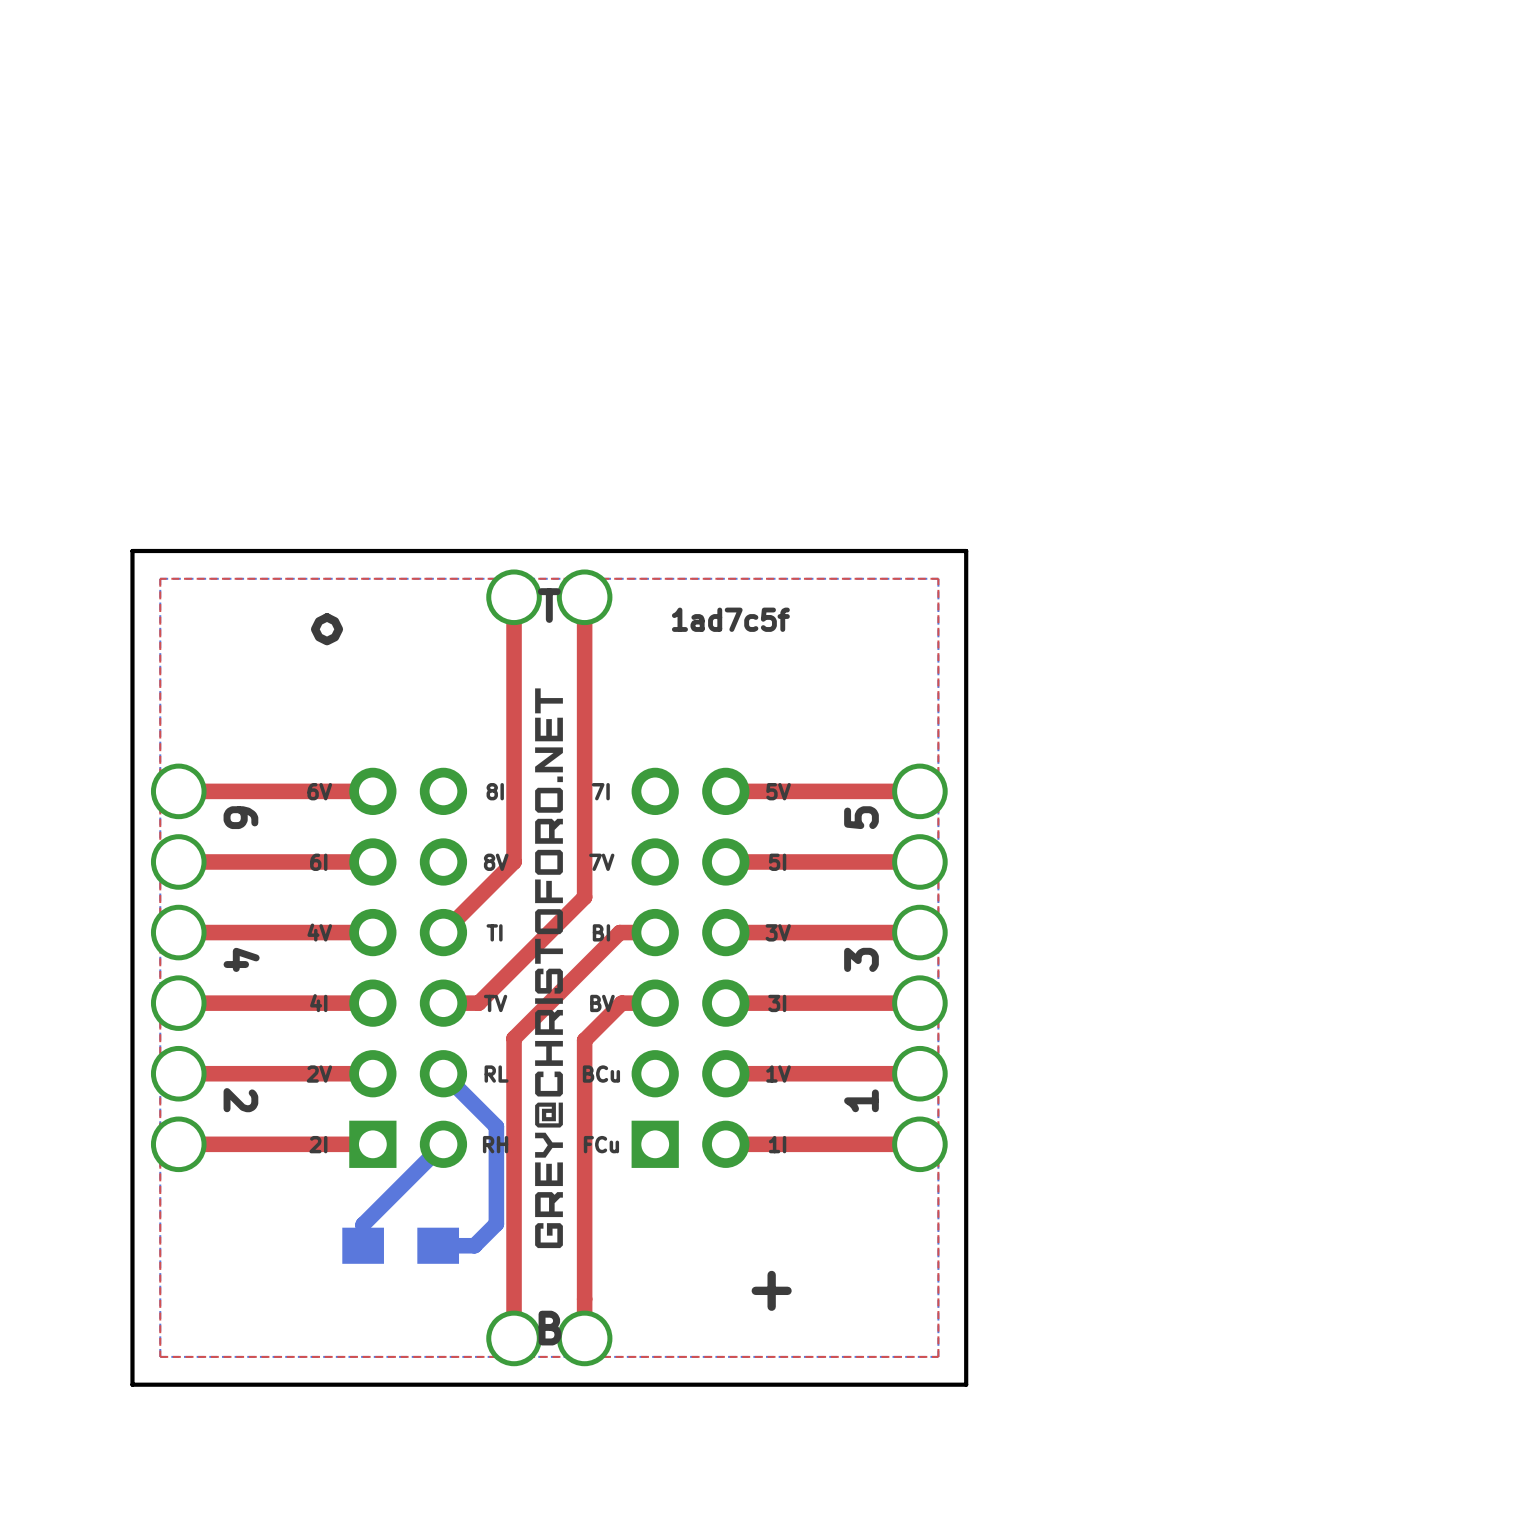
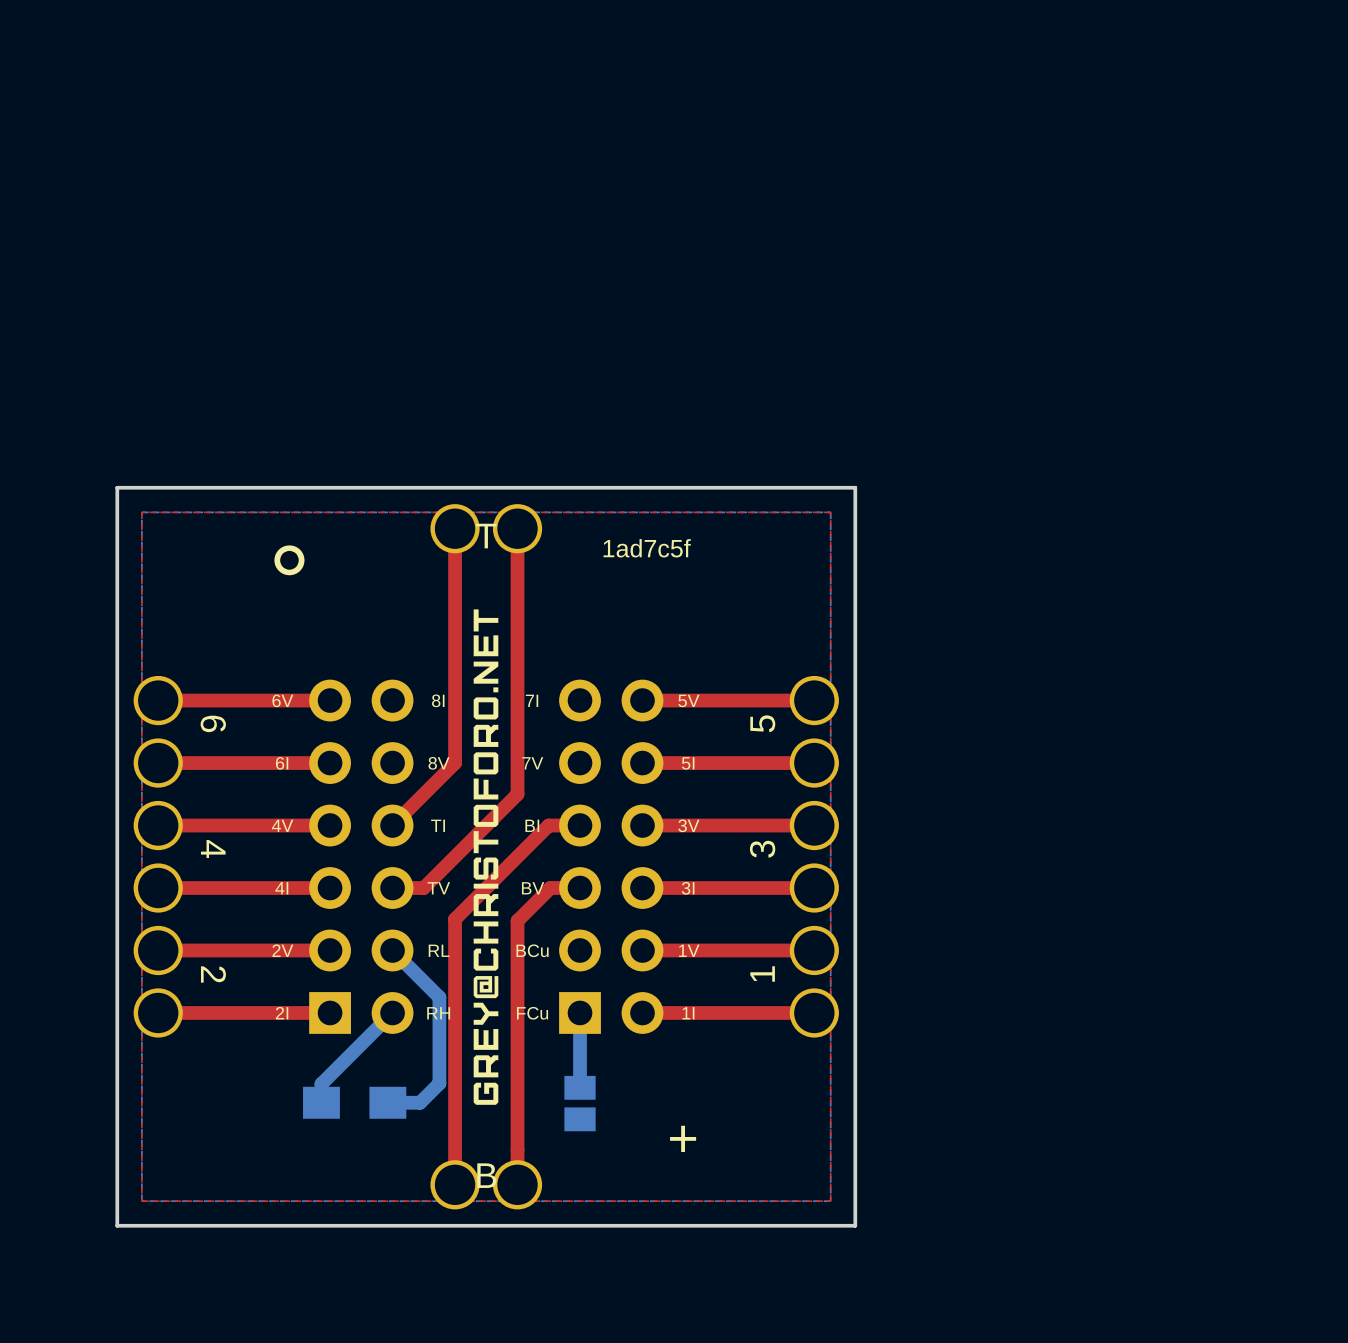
bottom track: none -> (580, 1012) (580, 1087)
part: none -> (580, 1103)

